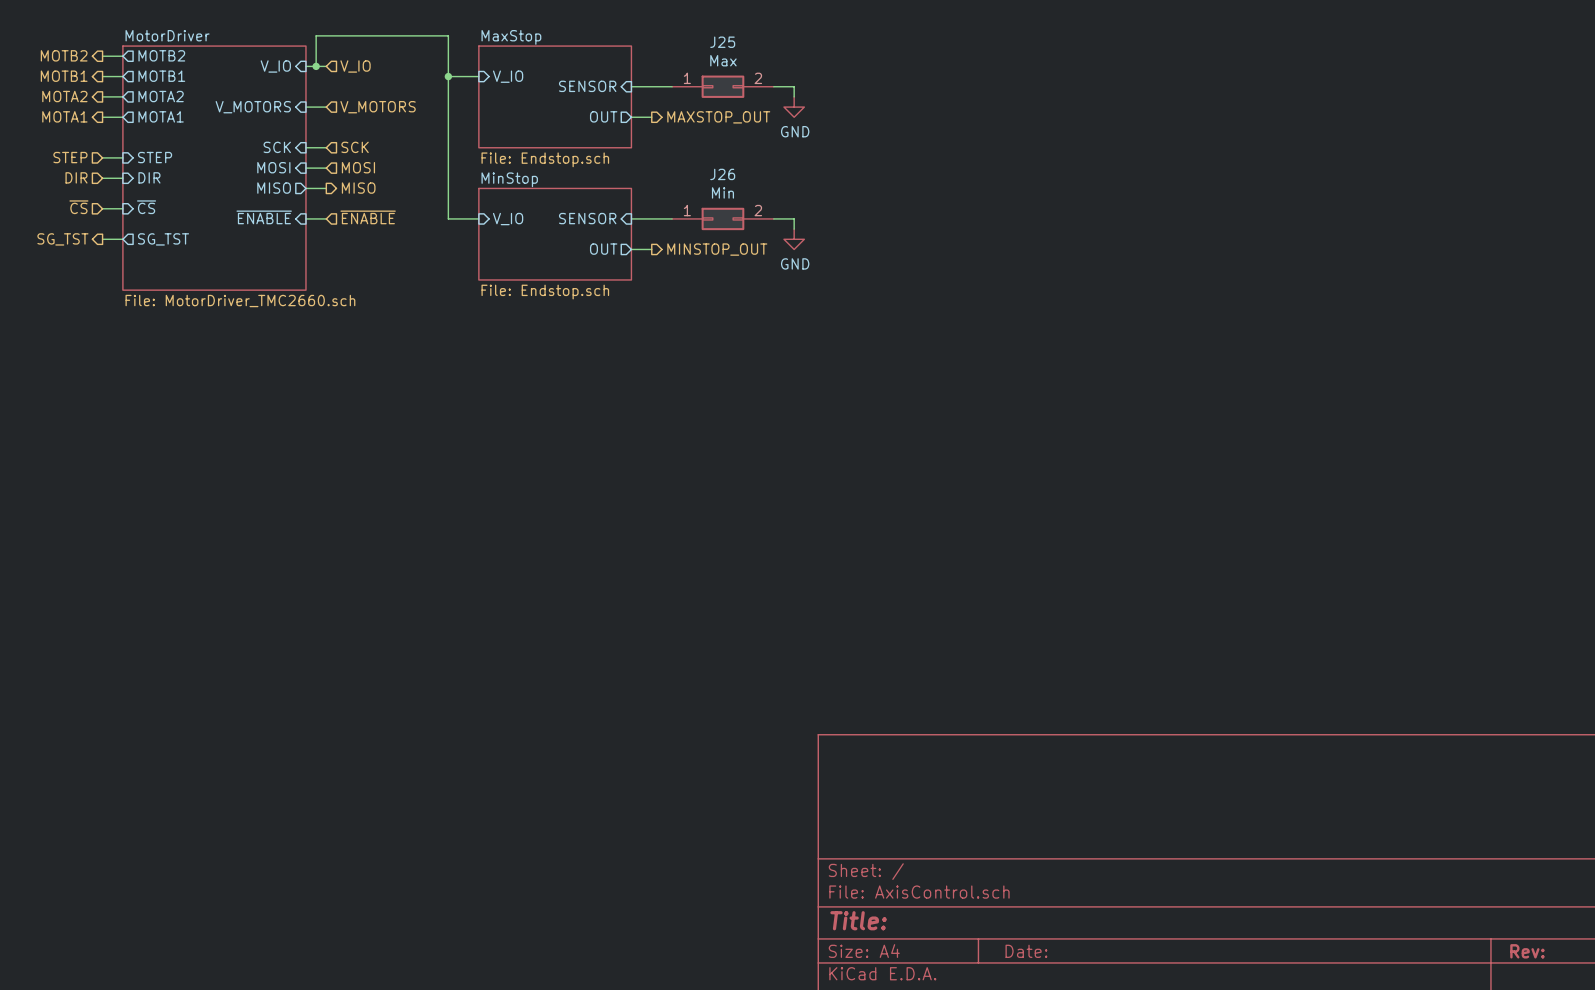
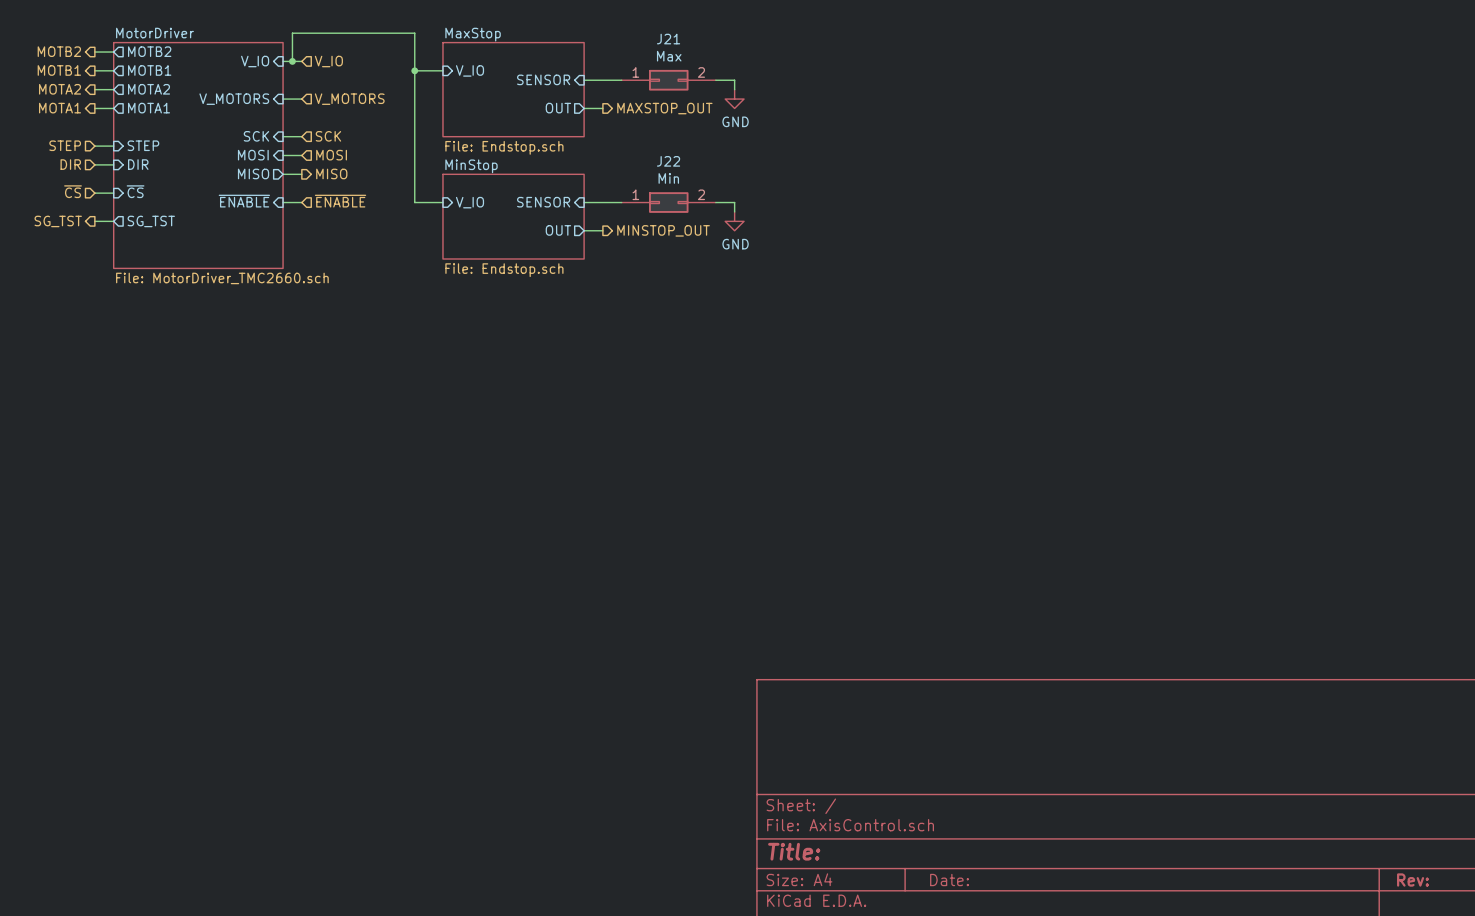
J25 name: J25 (722, 42) -> J21 (668, 39)
J26 name: J26 (722, 174) -> J22 (668, 161)

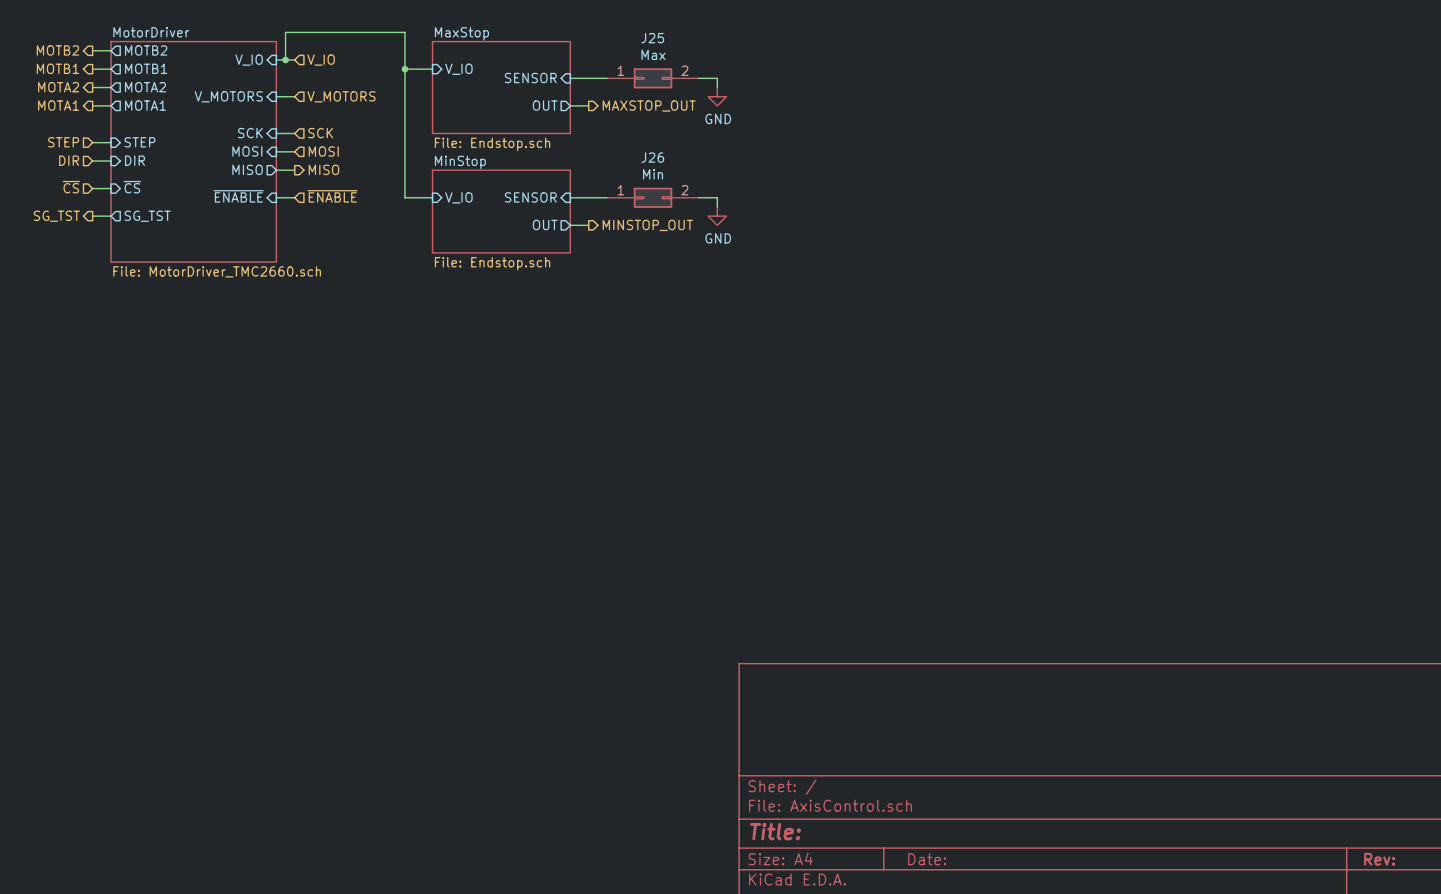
J21 name: J21 (668, 39) -> J25 (652, 38)
J22 name: J22 (668, 161) -> J26 (652, 157)

